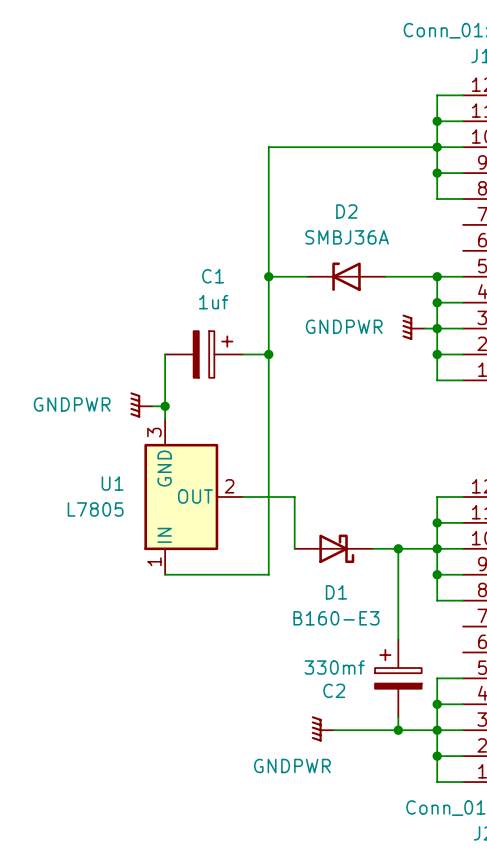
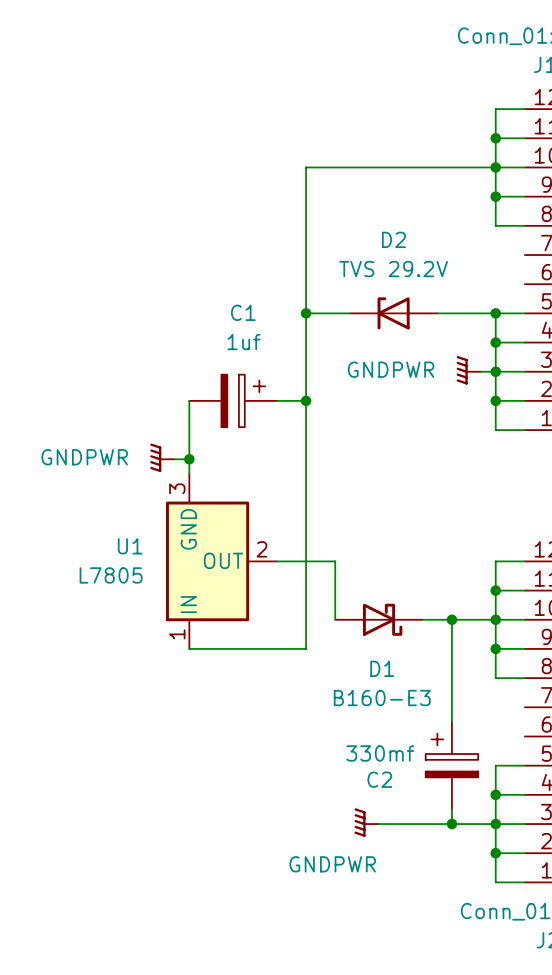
D2 value: SMBJ36A (347, 237) -> TVS 29.2V (393, 269)

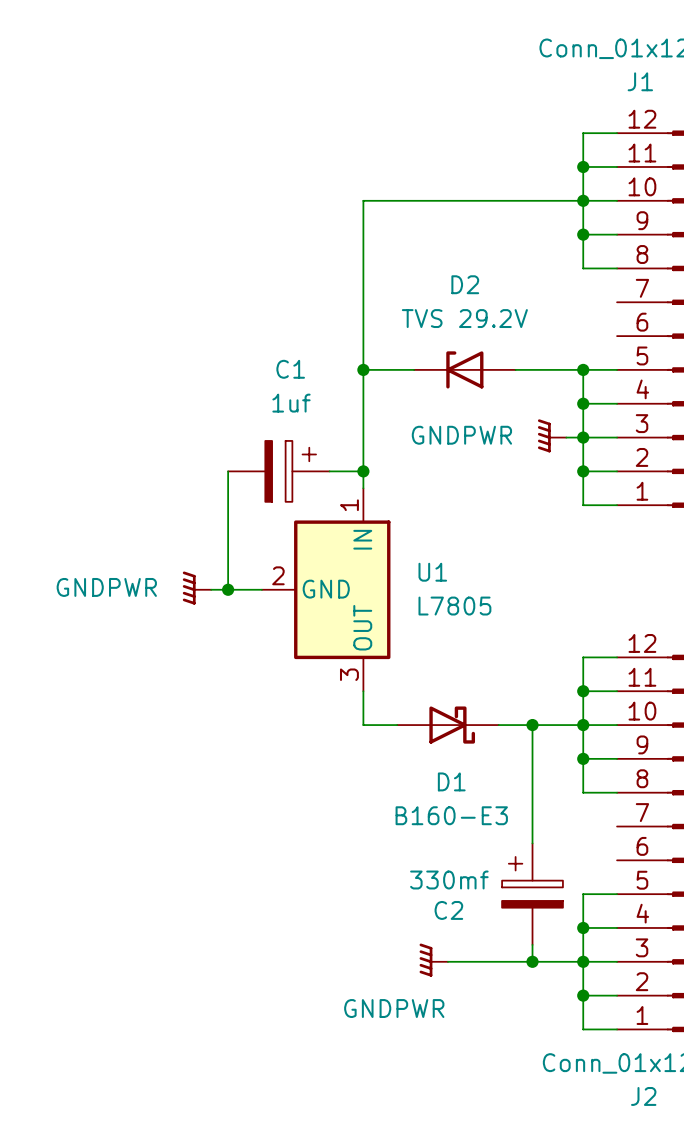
power symbol position: GNDPWR (162, 457) -> GNDPWR (196, 588)
wire: (174, 459) (189, 459) -> none
junction position: (189, 459) -> (228, 589)
U1 symbol: [165, 473, 277, 649] -> [261, 488, 391, 692]
U1 name position: U1 (130, 546) -> U1 (432, 572)
wire: (276, 561) (335, 561) (335, 619) -> (363, 725) (397, 725)
U1 value position: L7805 (111, 575) -> L7805 (454, 606)
wire: (306, 619) (306, 648) (189, 648) -> none

